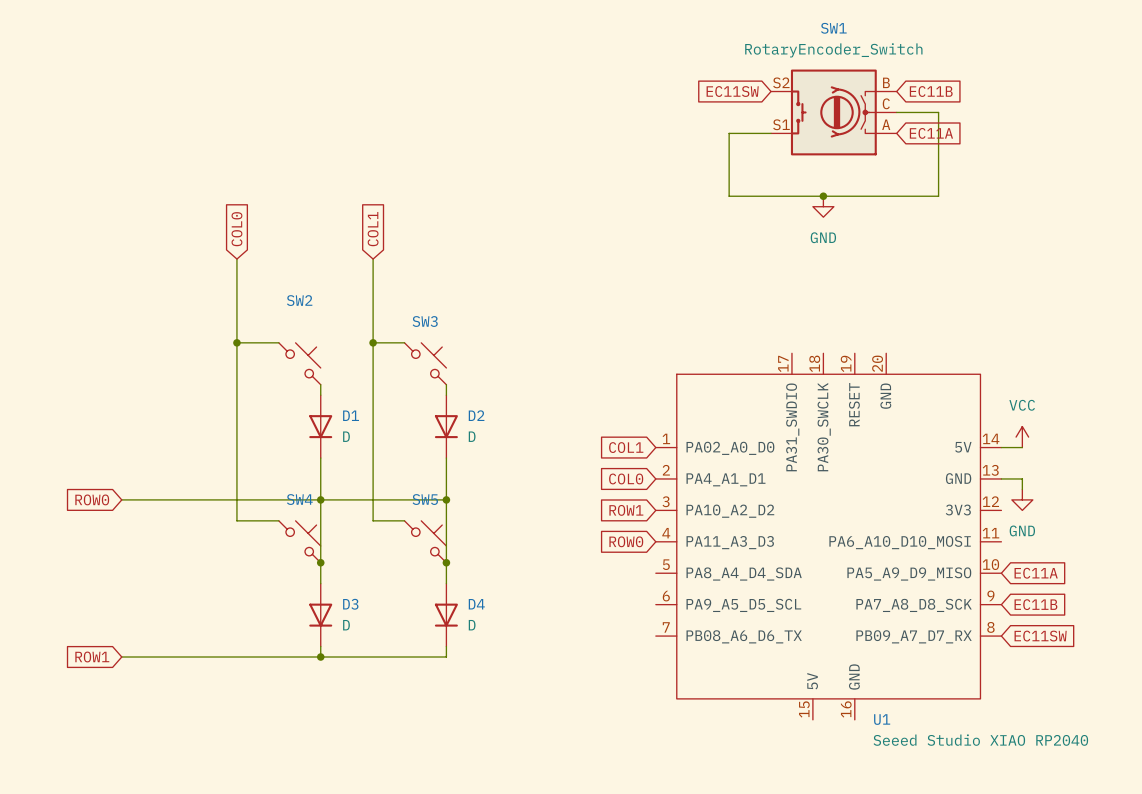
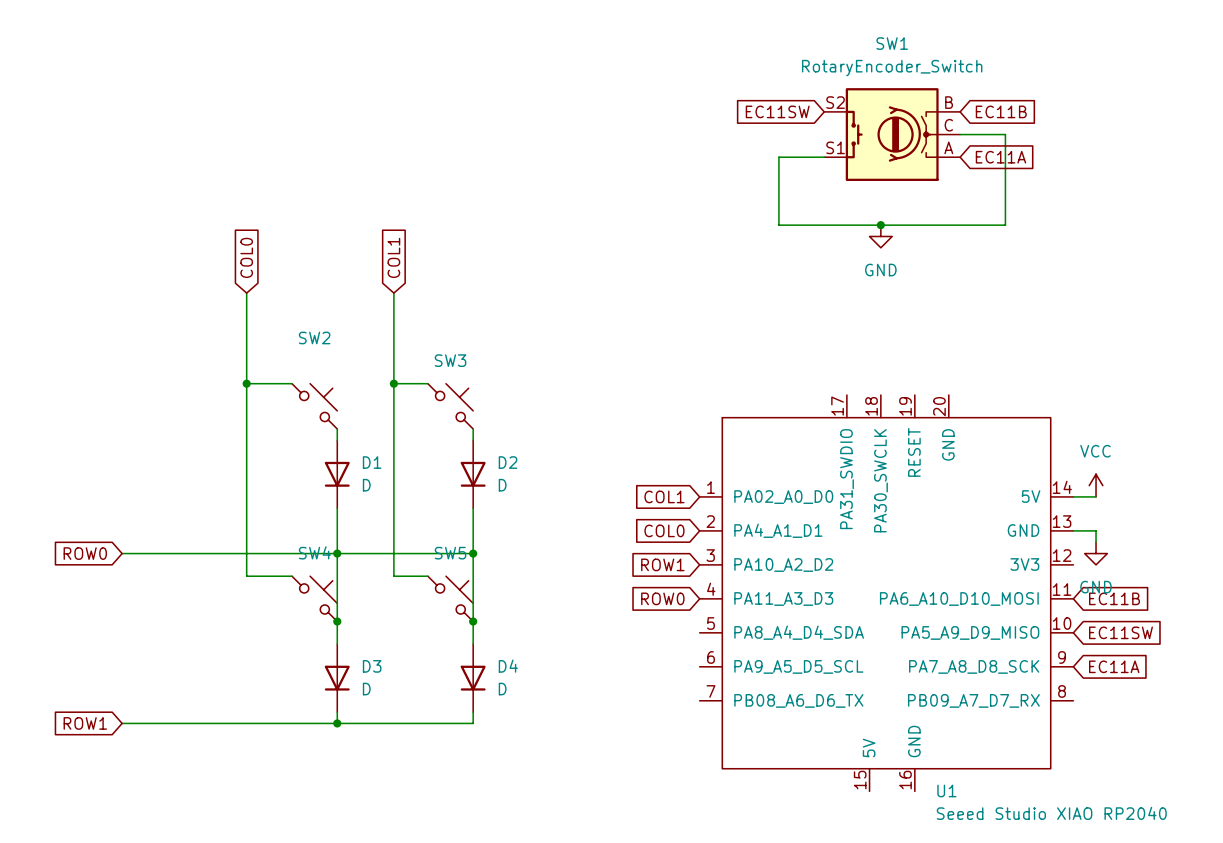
global label: none -> EC11B (1114, 598)
global label: EC11A (1036, 573) -> EC11SW (1120, 632)
global label: EC11B (1035, 604) -> EC11A (1114, 666)
global label: EC11SW (1040, 636) -> none

